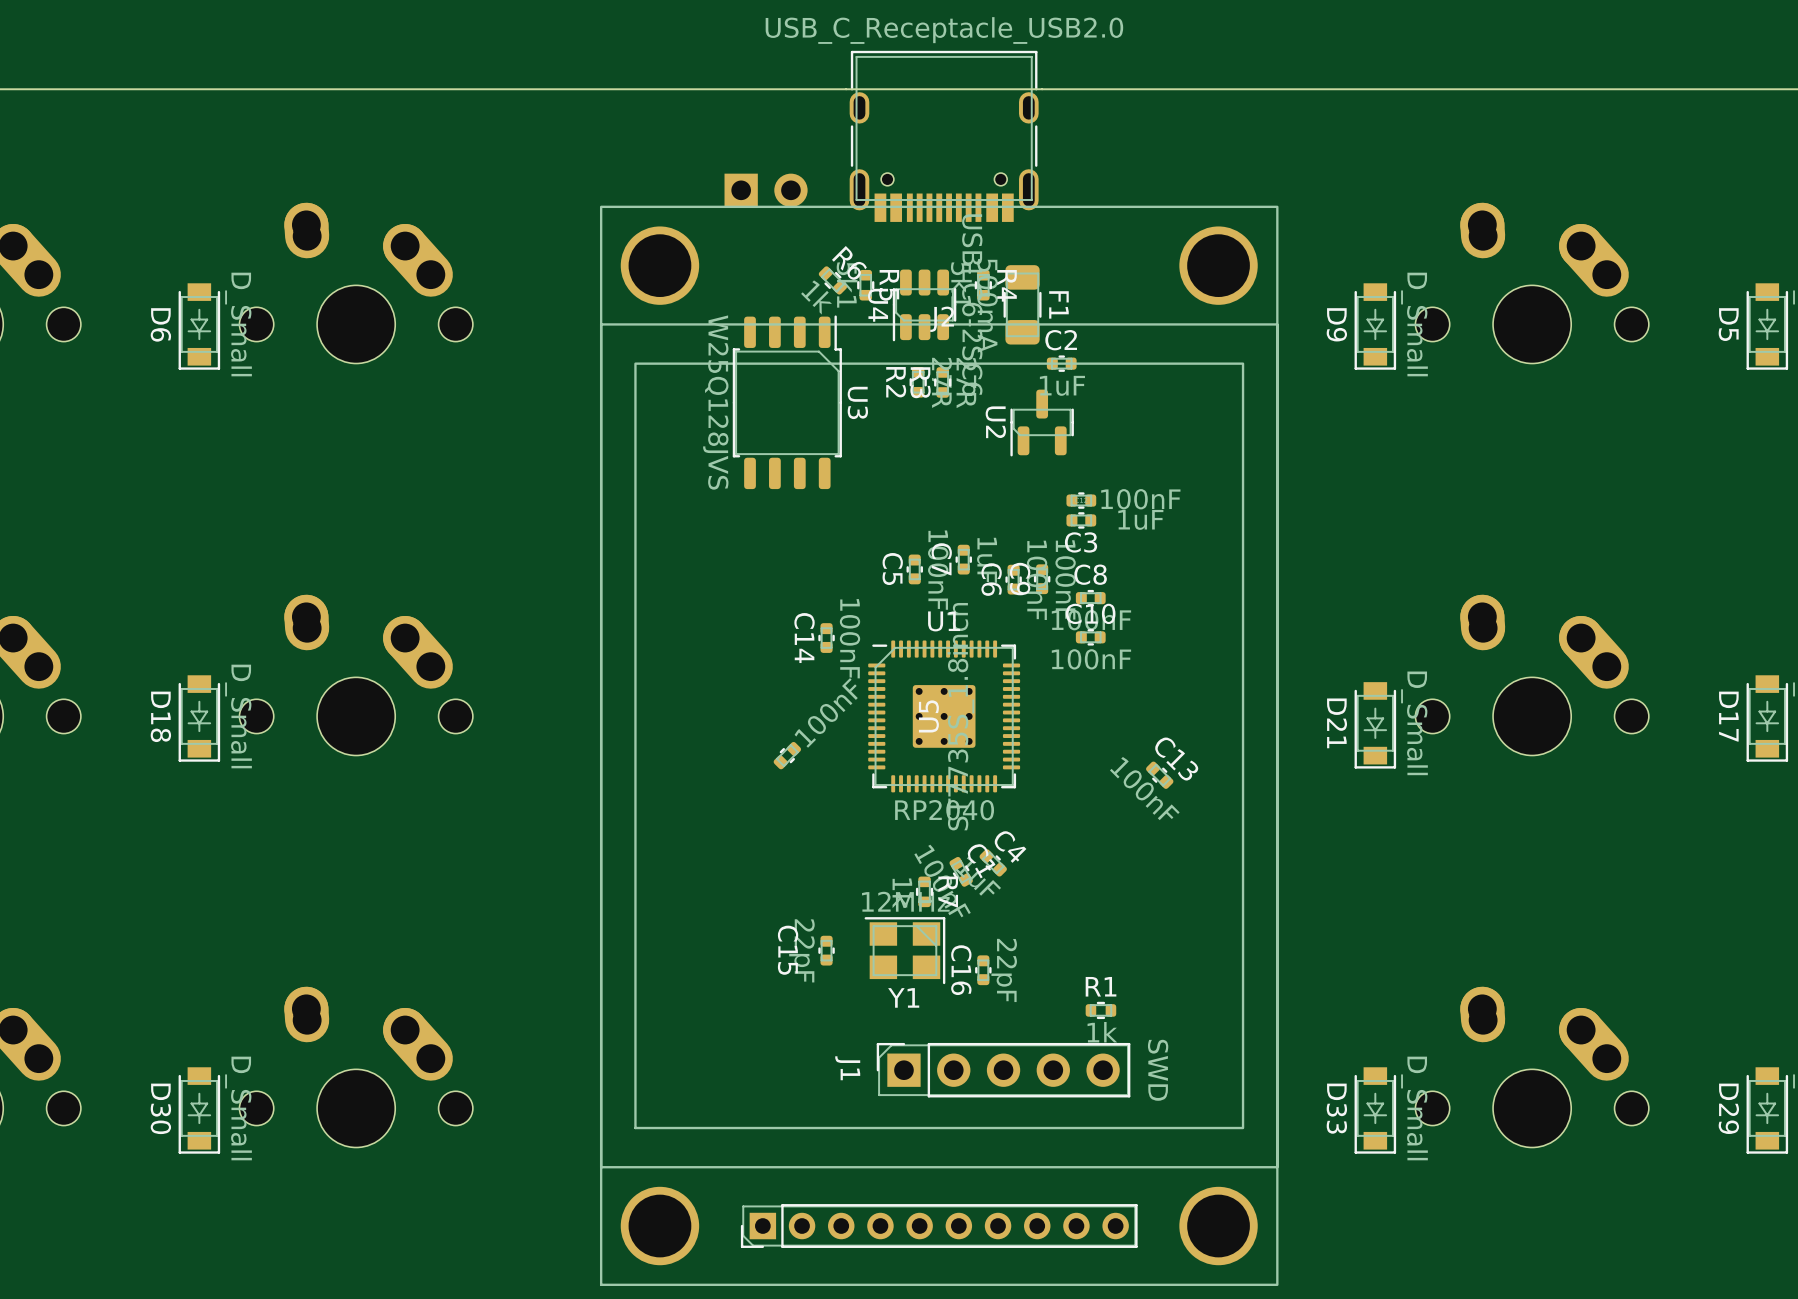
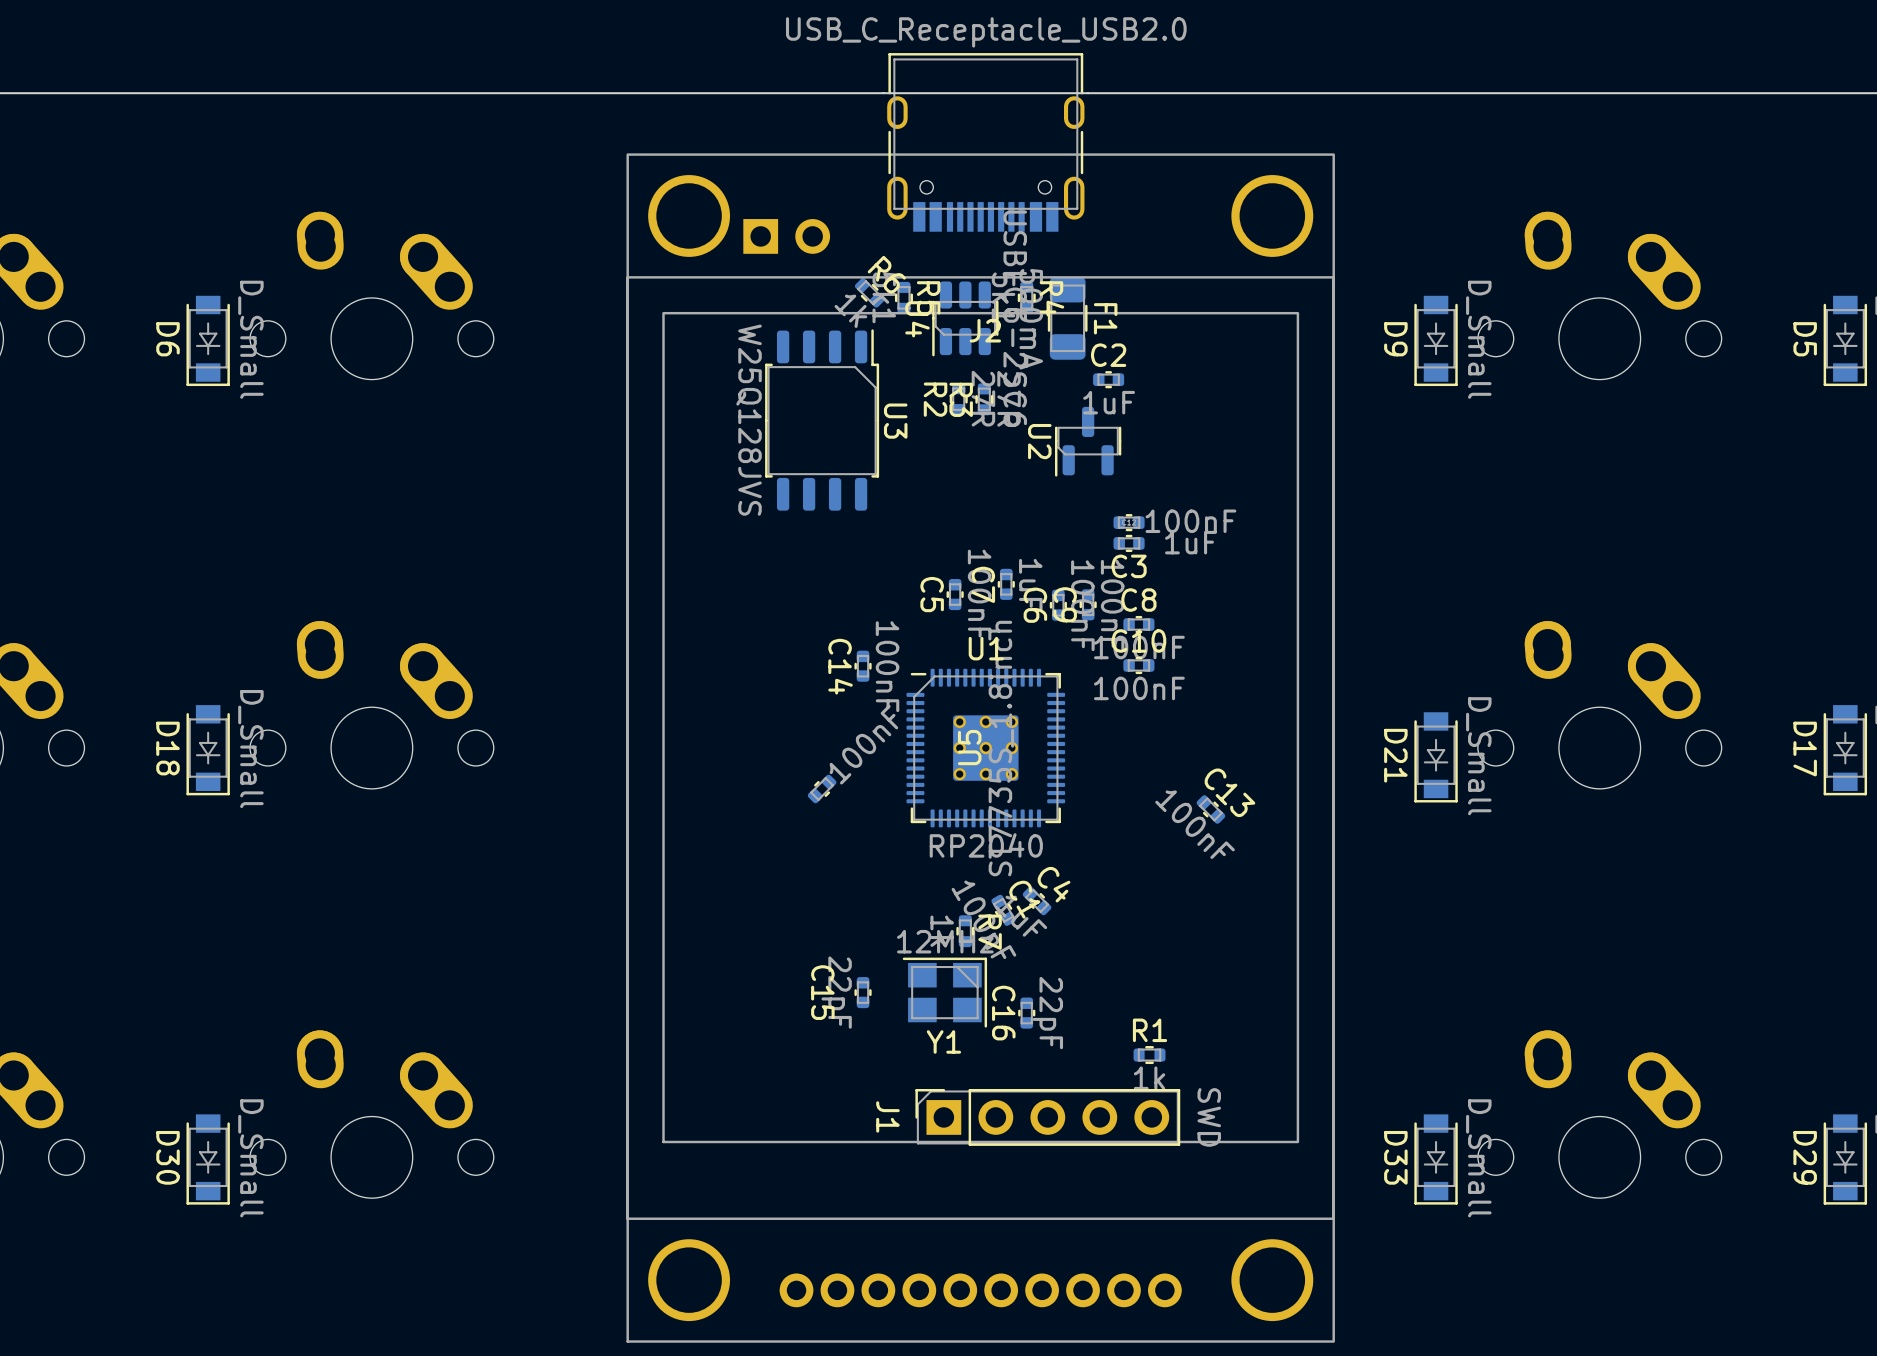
part position: (766, 190) -> (786, 236)
U5 footprint: [599, 205, 1279, 1286] -> [626, 153, 1335, 1343]

